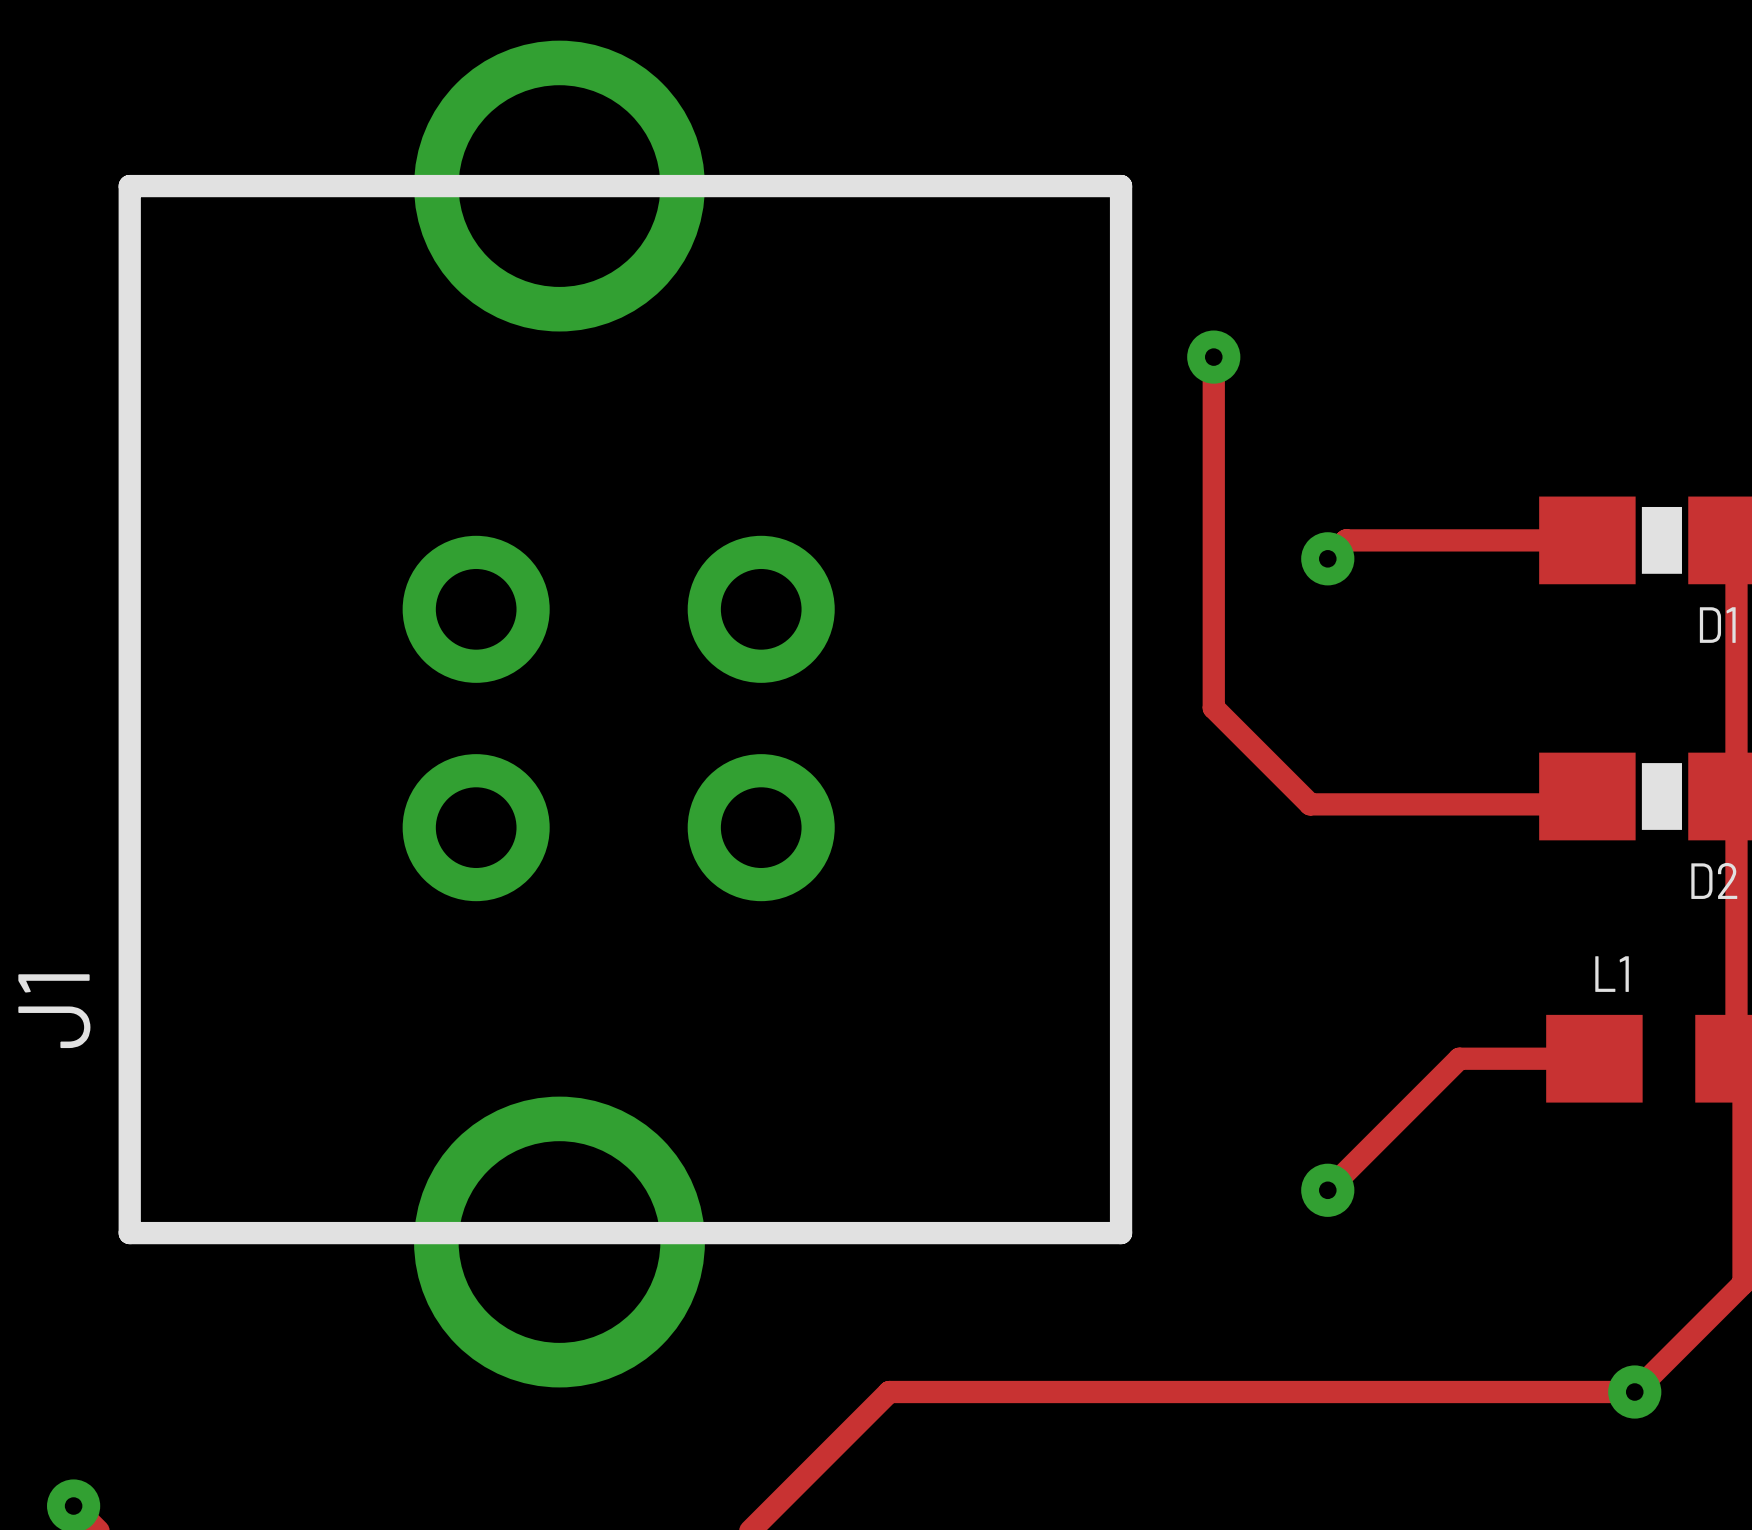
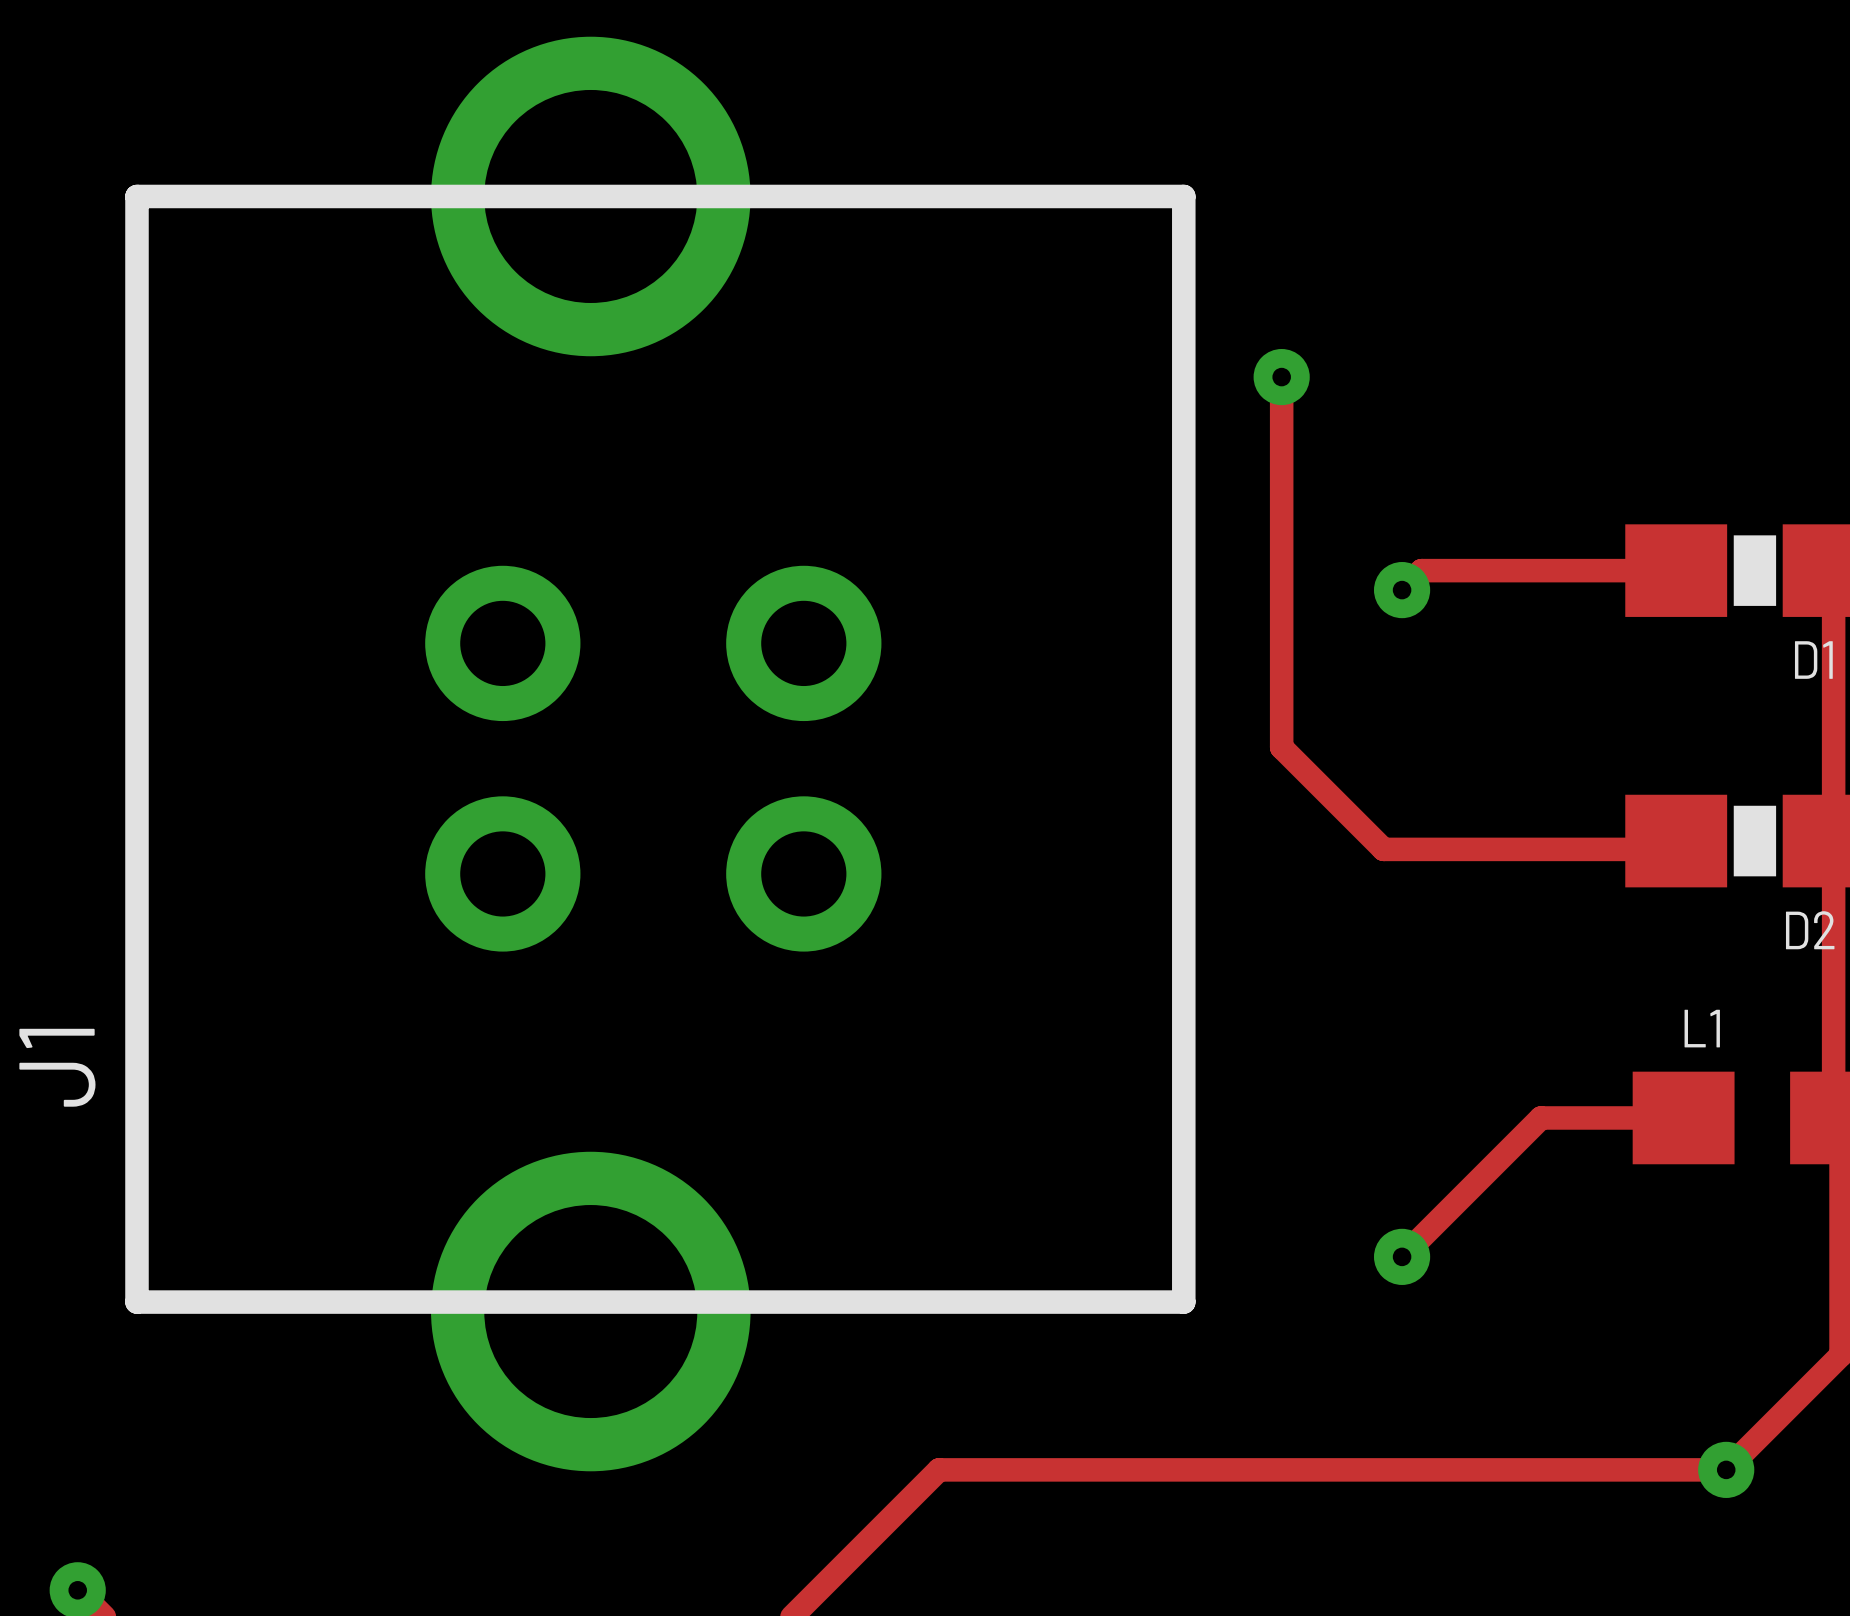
J1 footprint: [118, 40, 1133, 1388] -> [125, 36, 1196, 1472]

